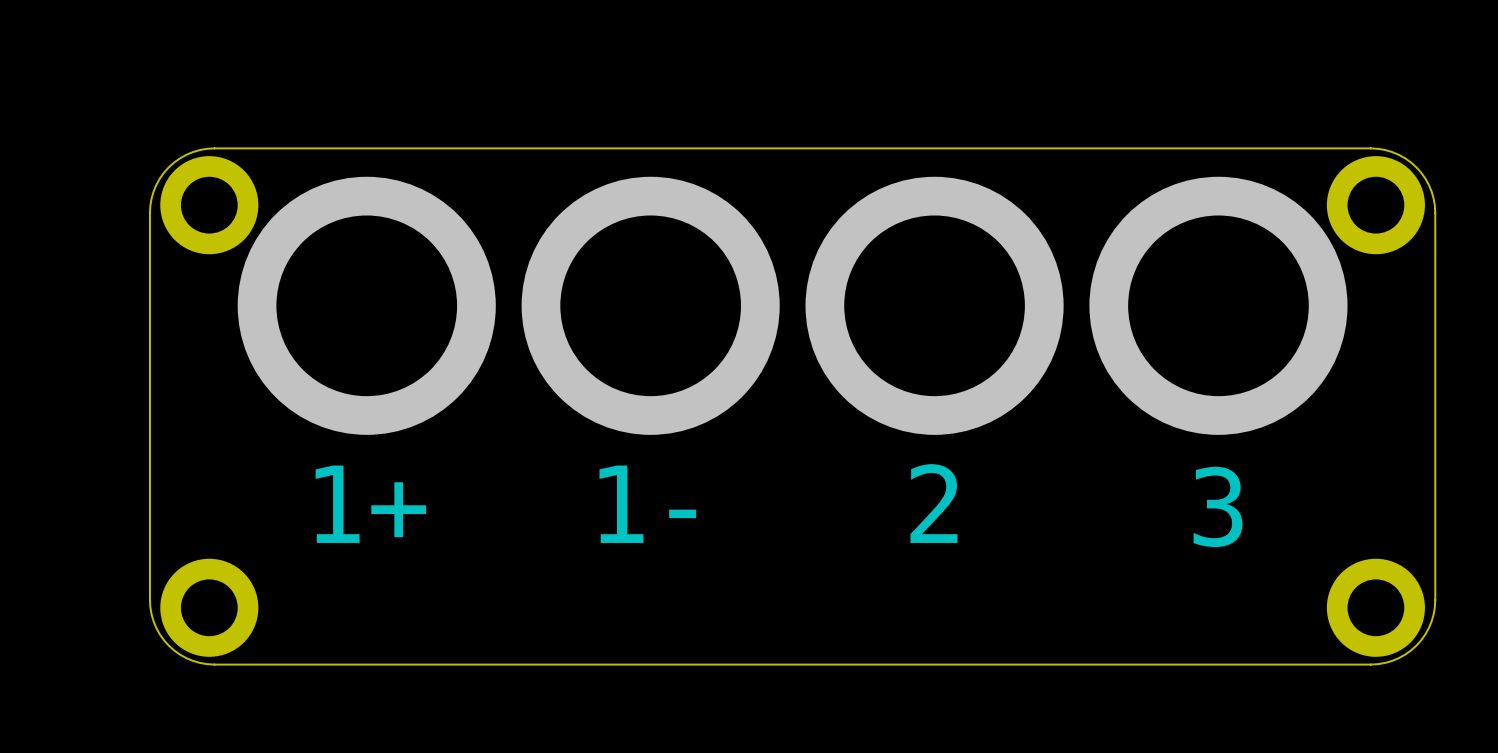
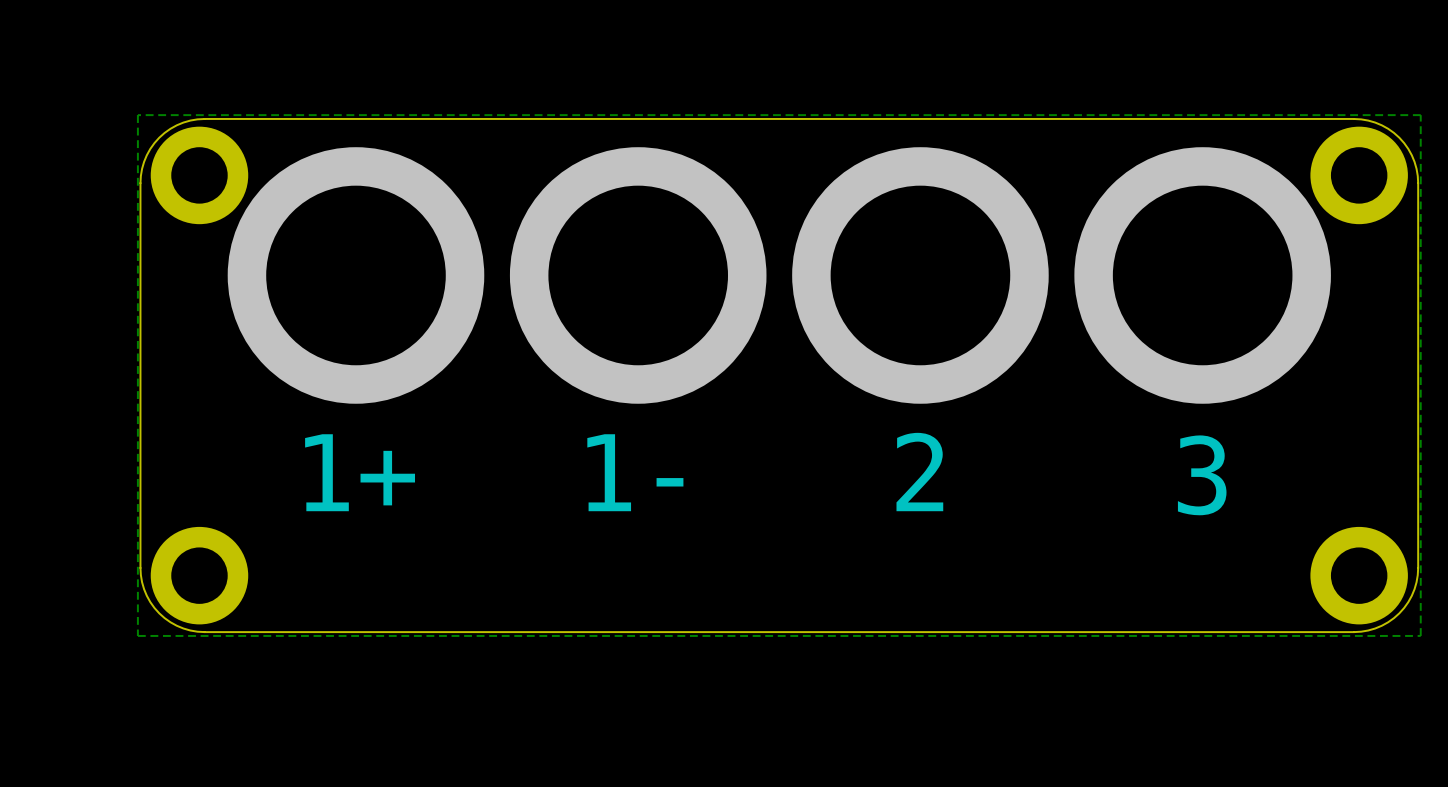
zone outline: none -> (1420, 115) (137, 115) (137, 635) (1420, 635) (1420, 115)

